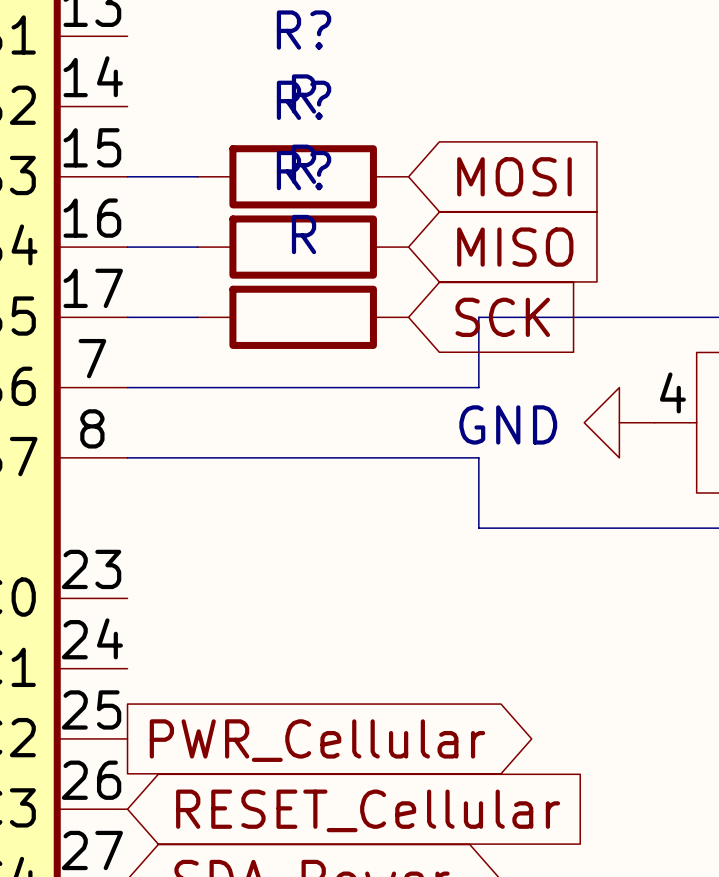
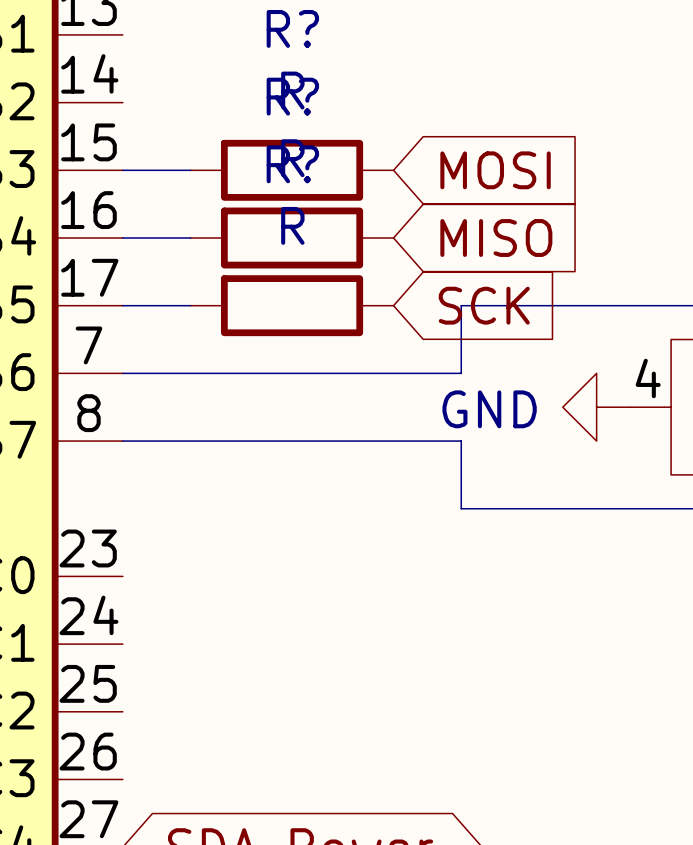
global label: PWR_Cellular (317, 740) -> none
global label: RESET_Cellular (368, 810) -> none

